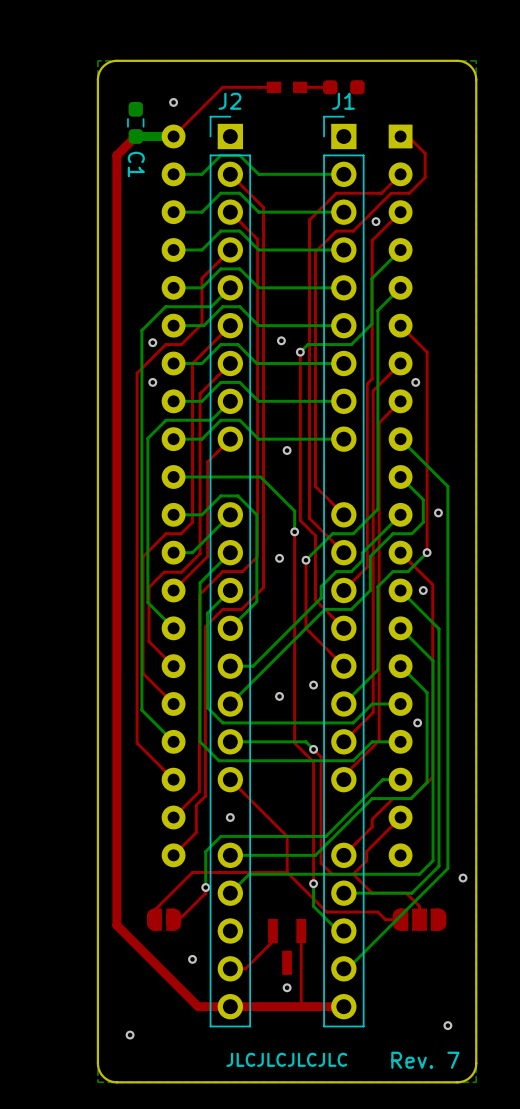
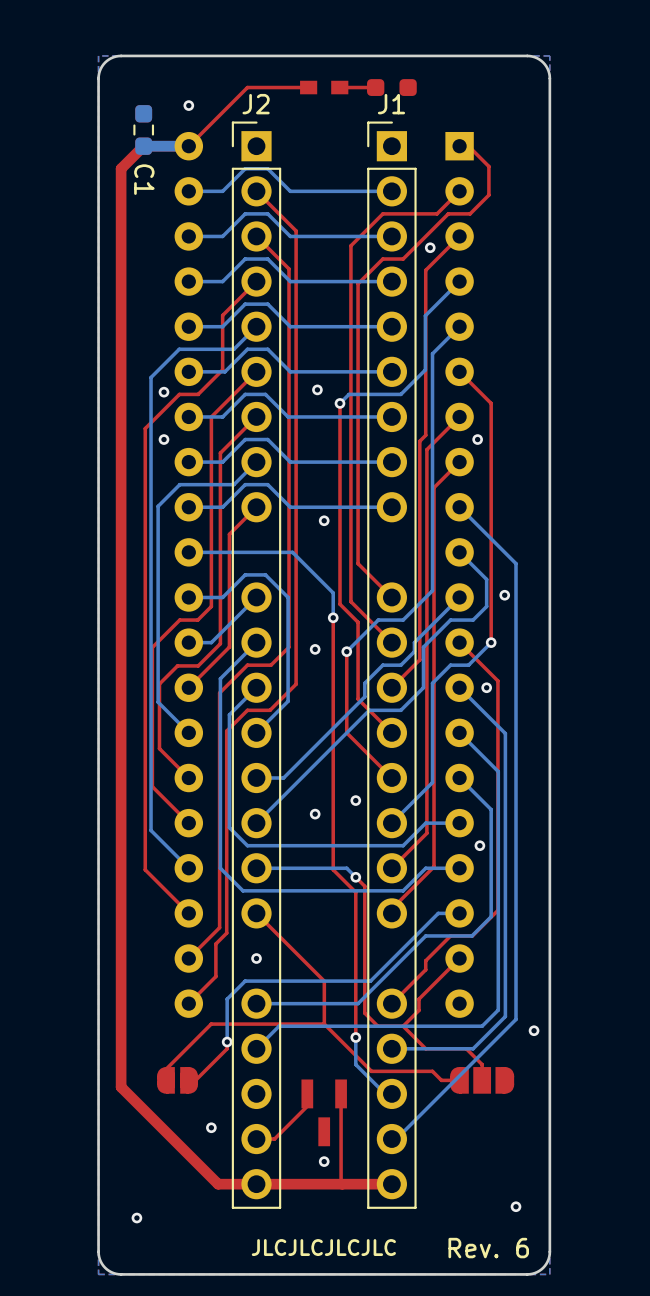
text: Rev. 7 (425, 1060) -> Rev. 6 (488, 1248)

